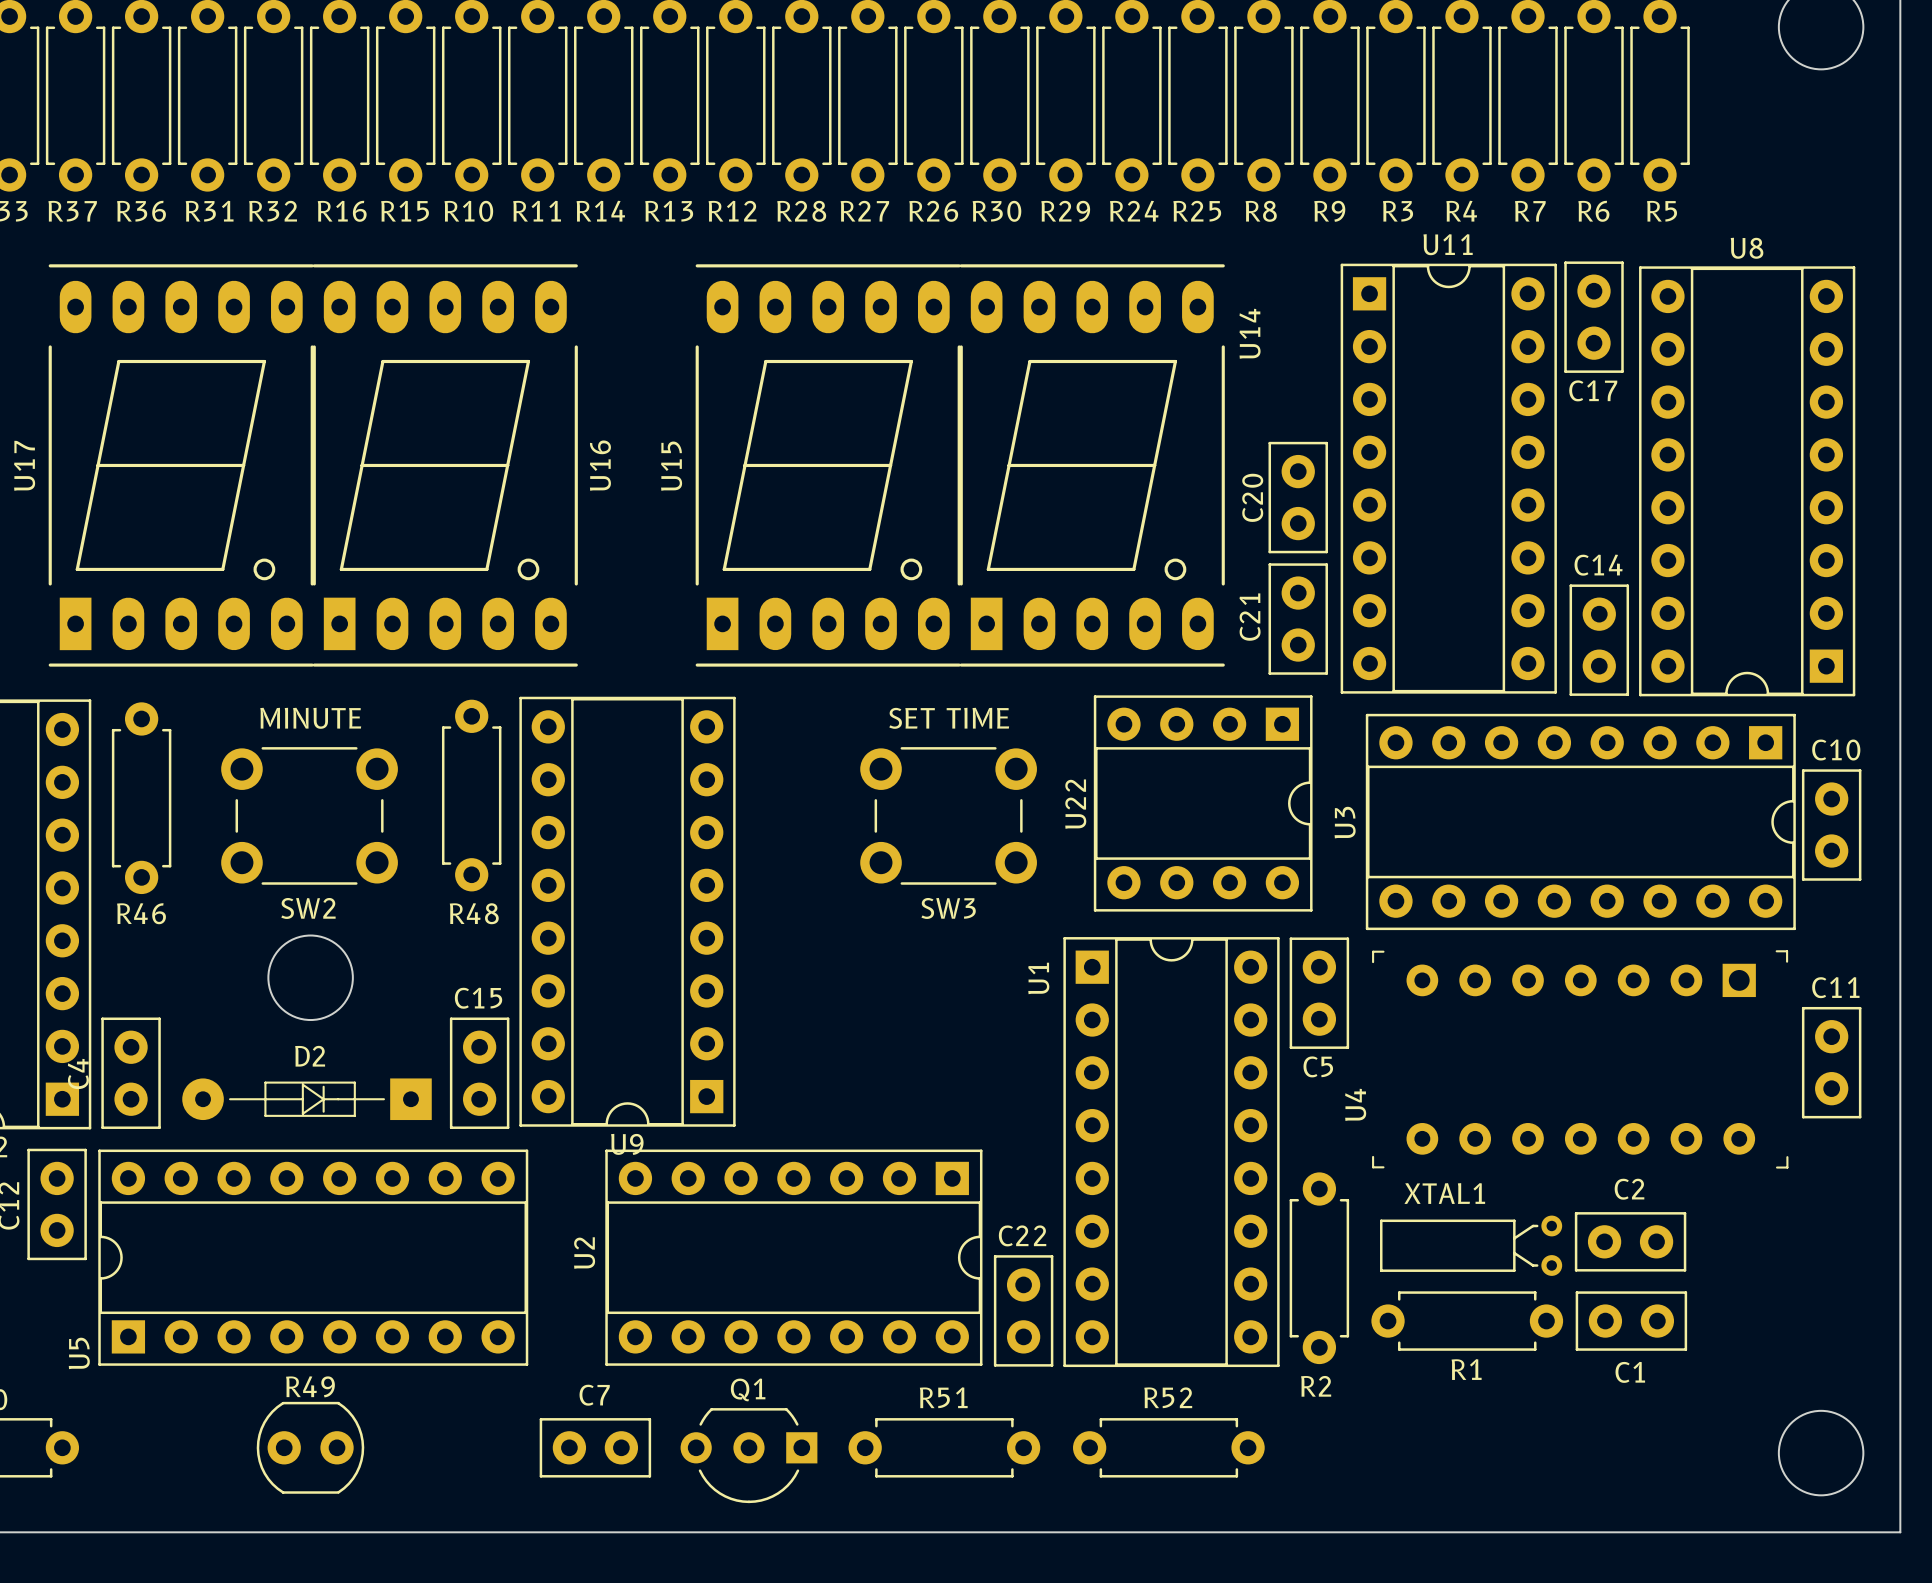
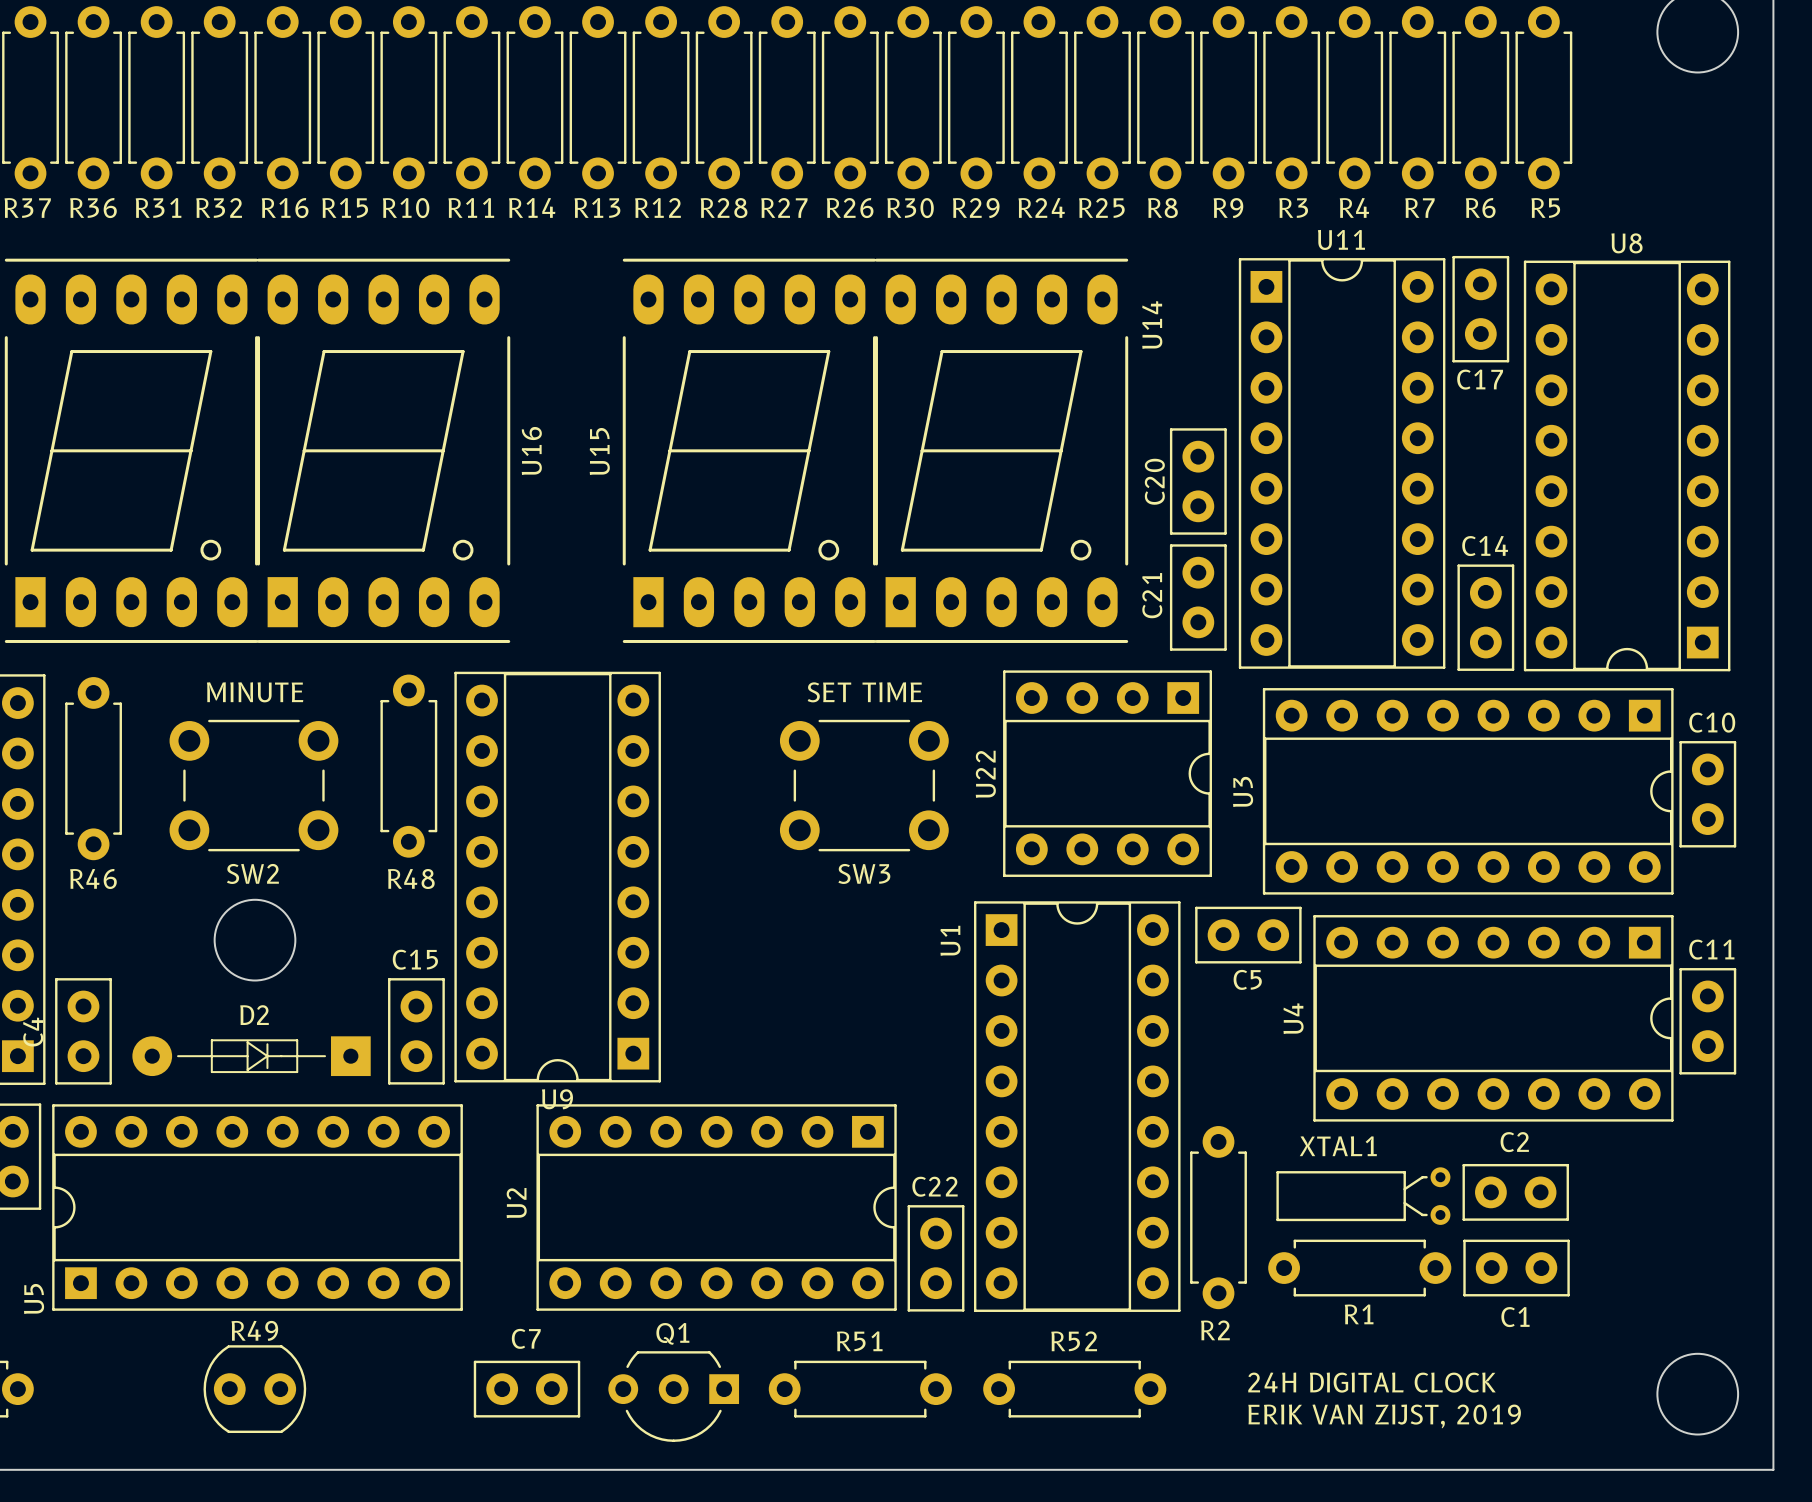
U4 footprint: [1372, 950, 1789, 1169] -> [1313, 915, 1674, 1122]
C5 rotation: 0° (1319, 993) -> 90° clockwise (1248, 935)
U4 name position: U4 (1355, 1104) -> U4 (1293, 1018)
text: none -> 24H DIGITAL CLOCK (1371, 1382)
text: none -> ERIK VAN ZIJST, 2019 (1384, 1416)

